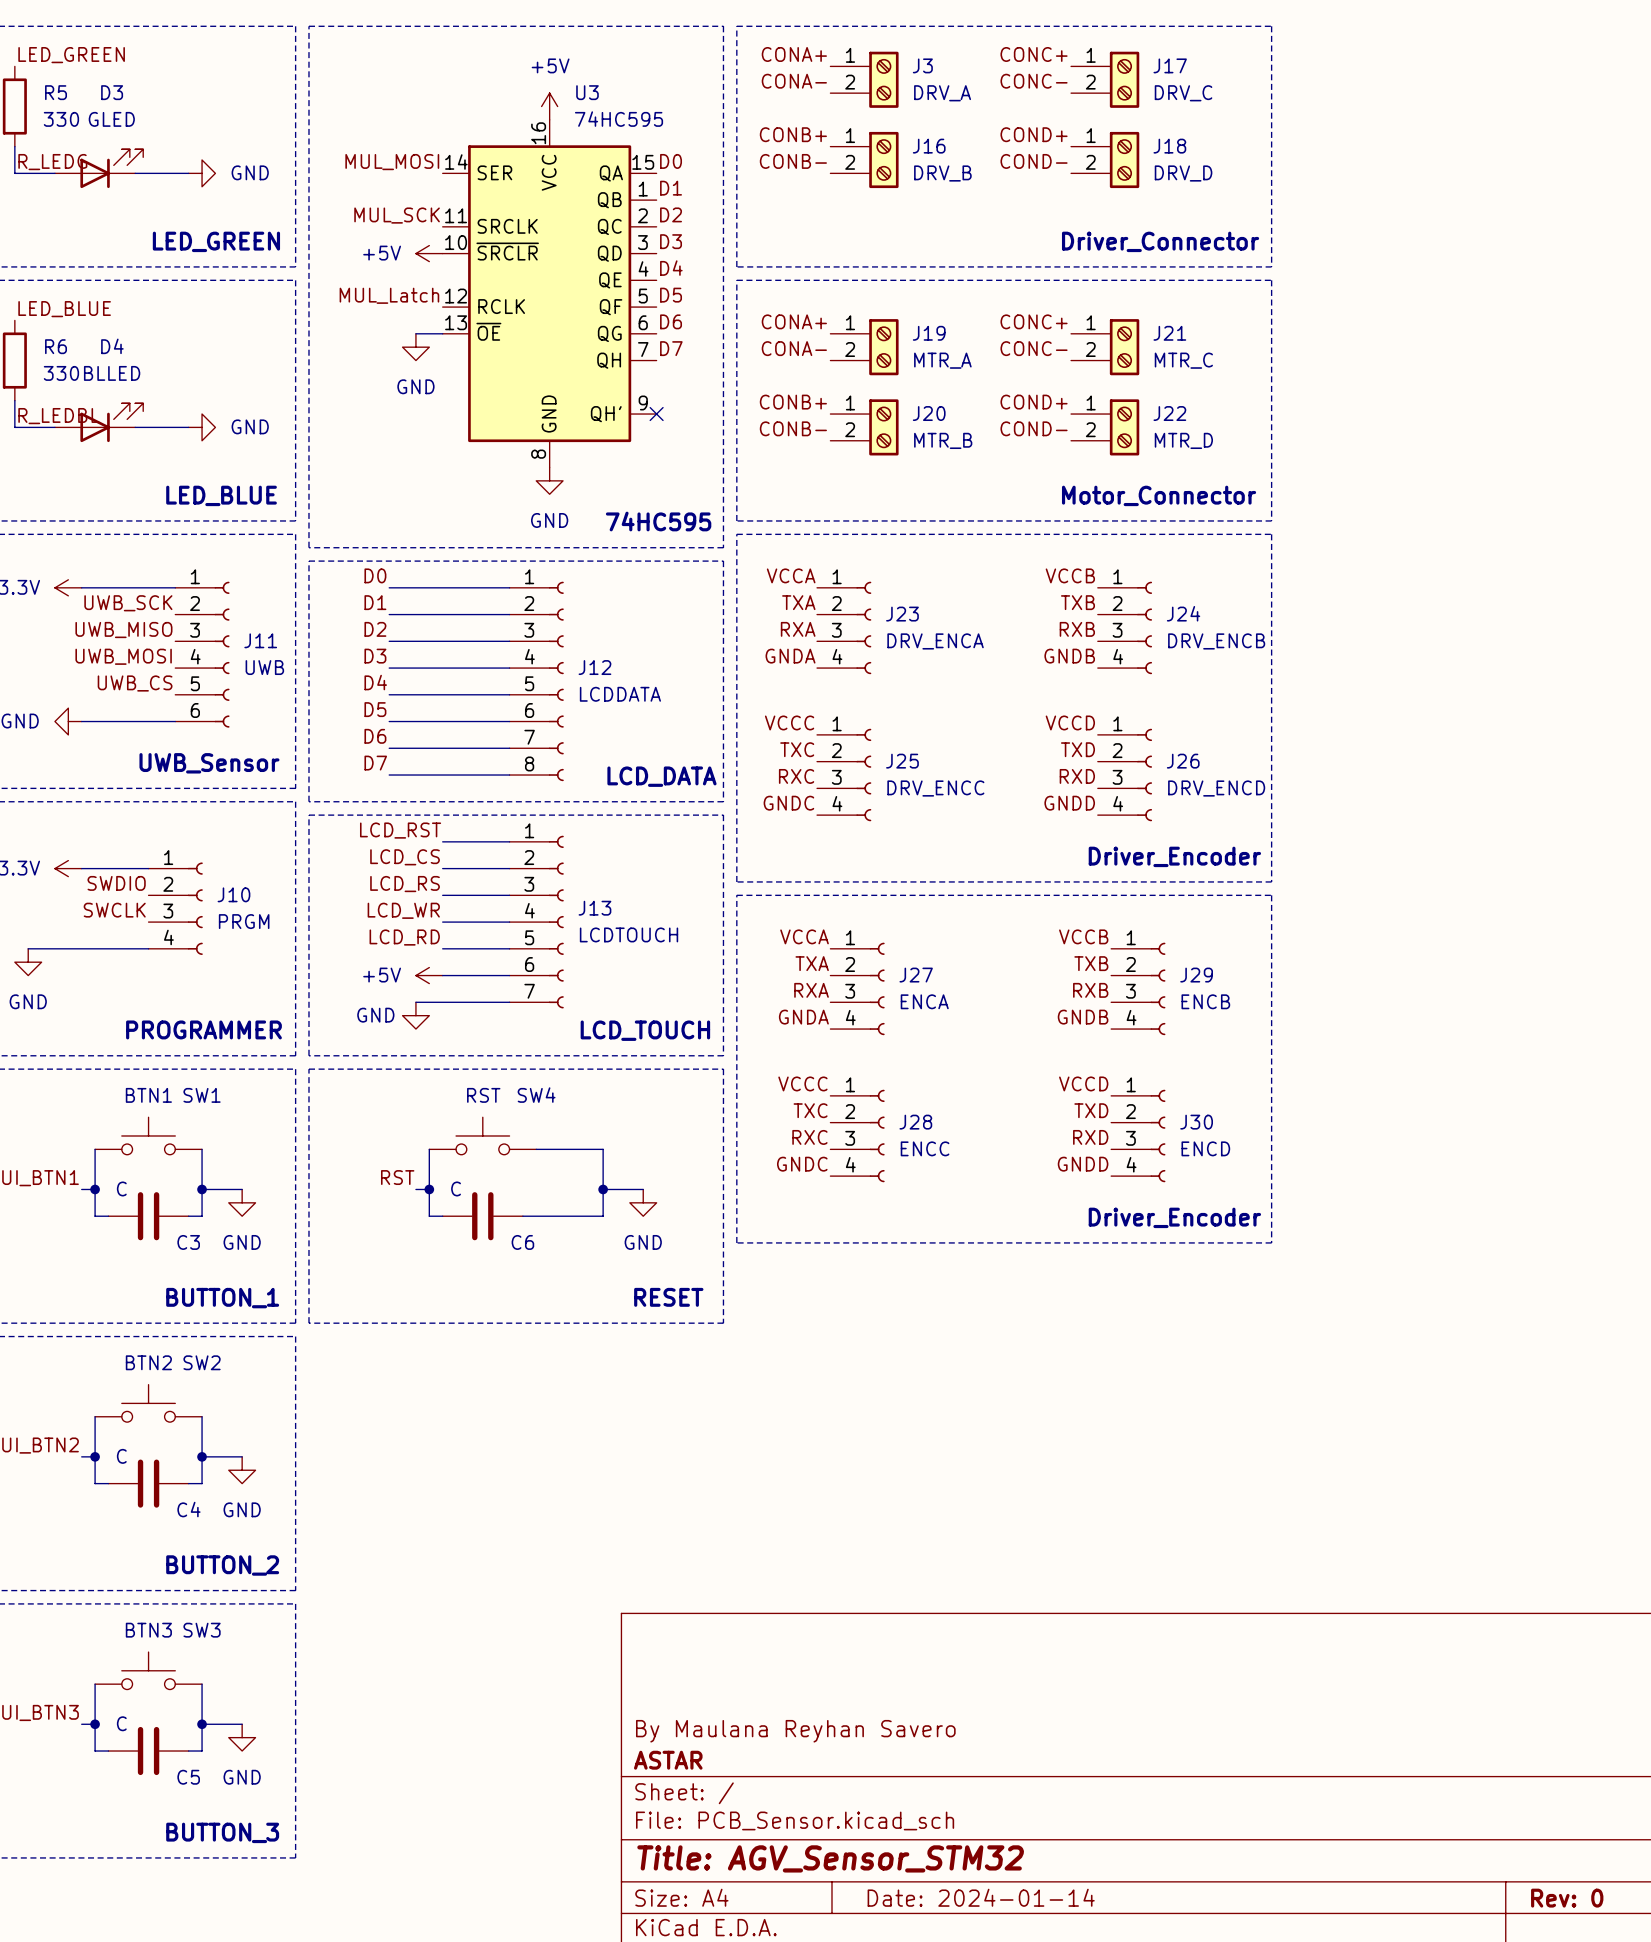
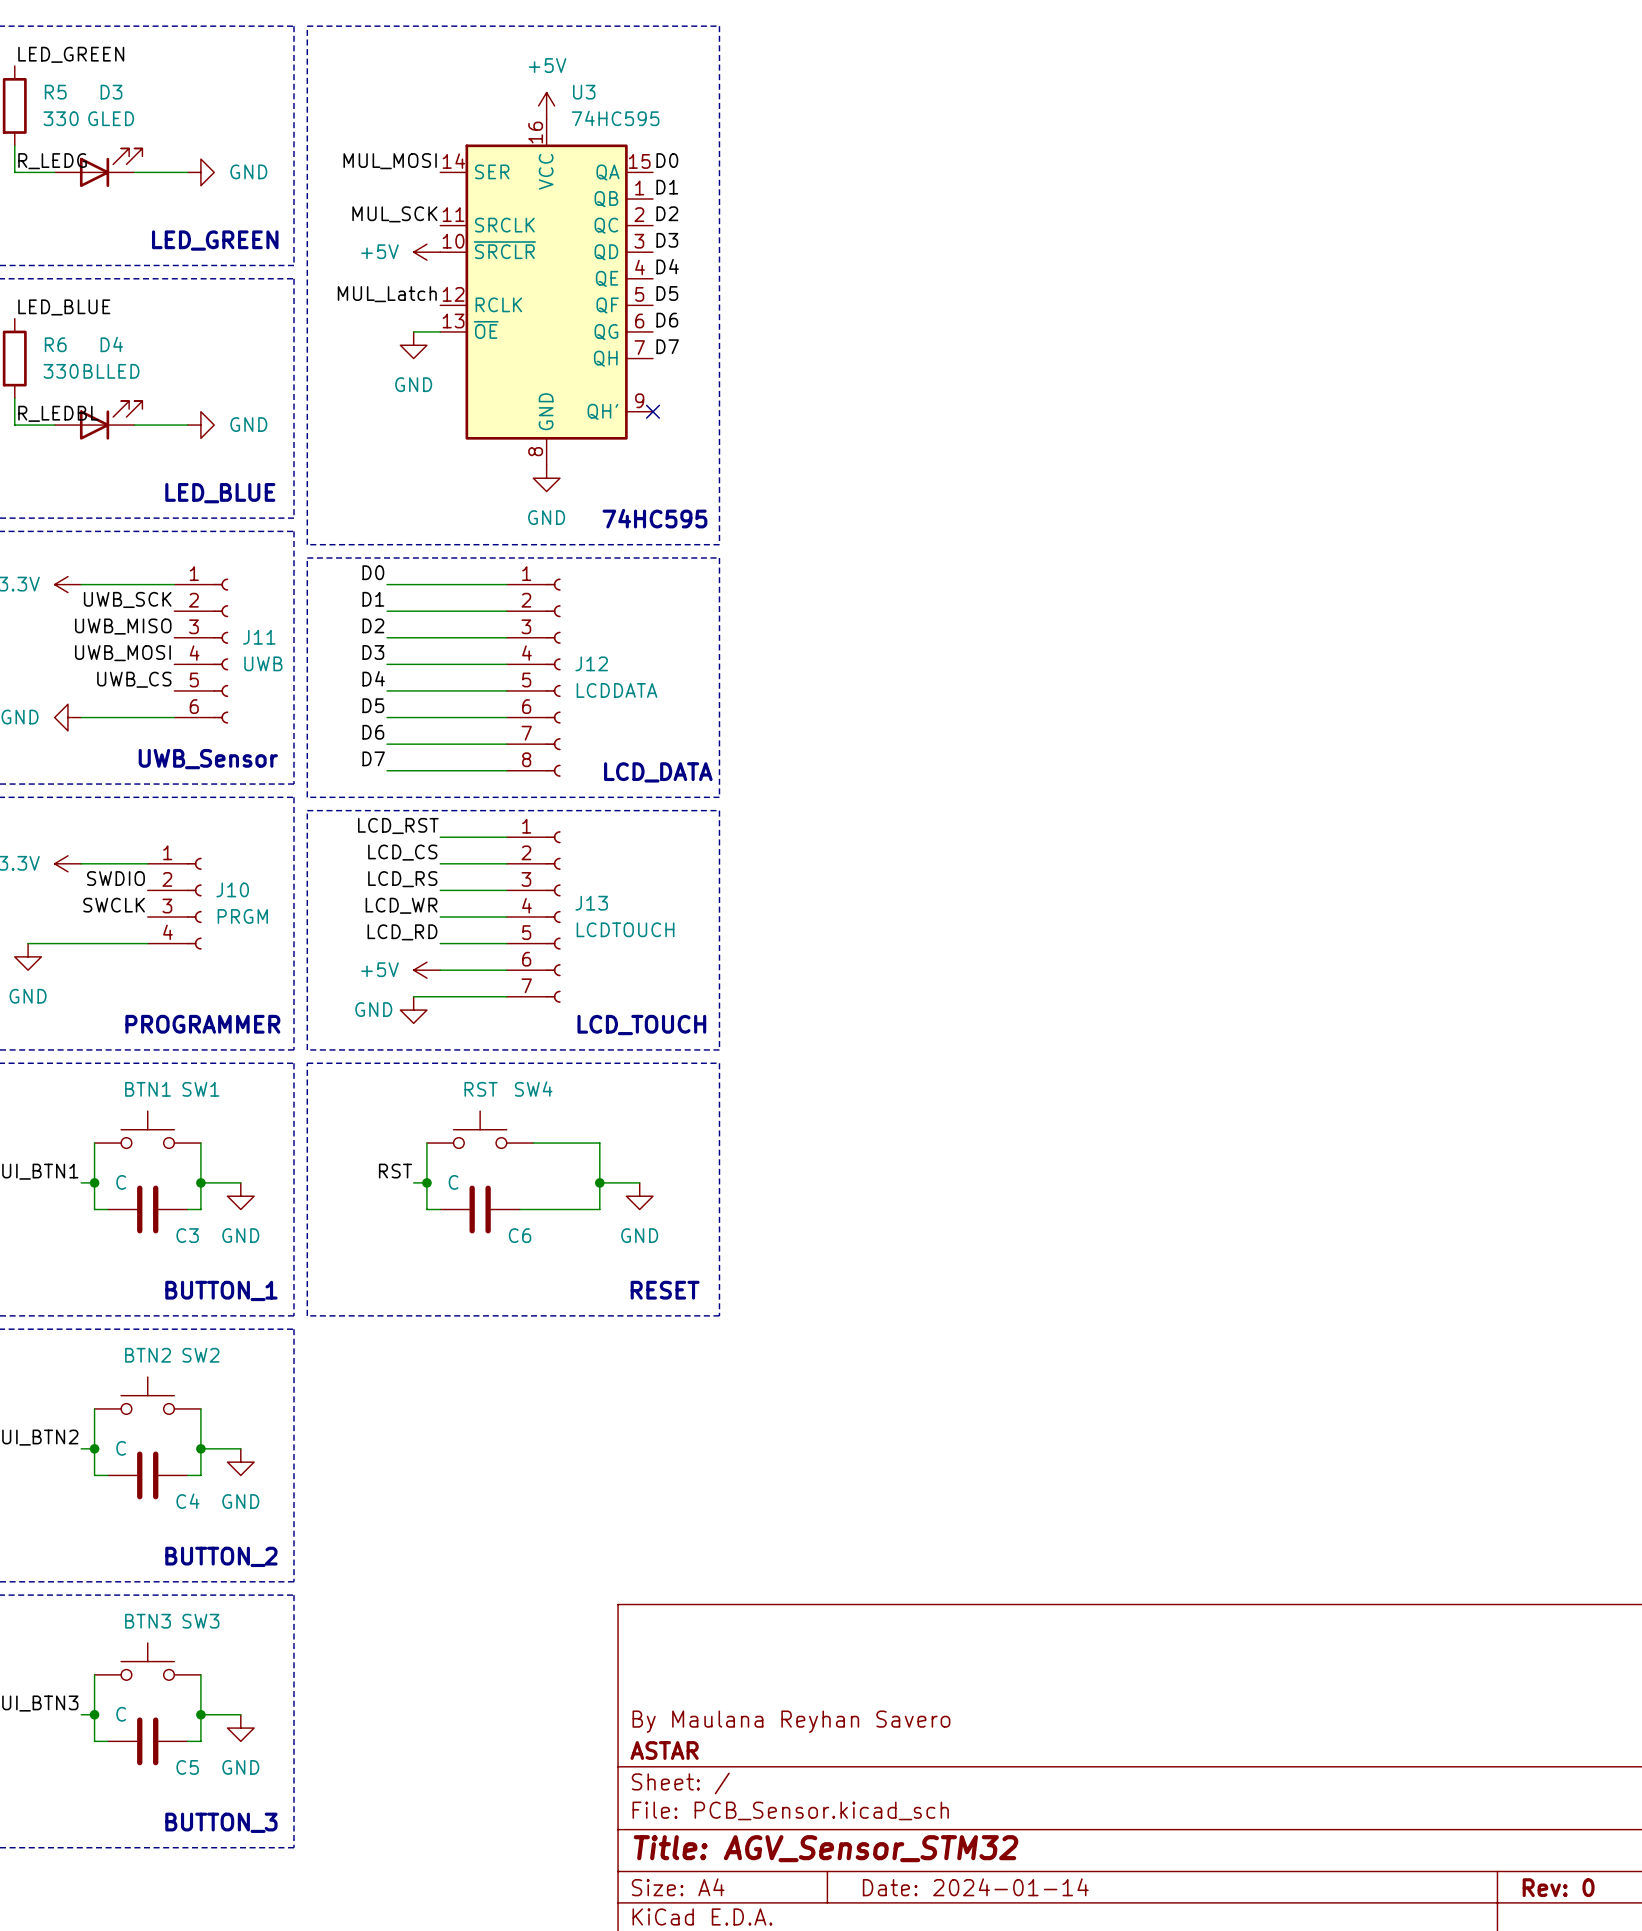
line: (736, 26) (1271, 26) (1271, 266) (736, 266) (736, 26) -> none
label: CONA+ (794, 54) -> none
label: CONC+ (1034, 54) -> none
J3: DRV_A (864, 79) -> none
J17: DRV_C (1105, 79) -> none
label: CONA- (794, 81) -> none
label: CONC- (1034, 81) -> none
label: CONB+ (793, 134) -> none
label: COND+ (1034, 134) -> none
J16: DRV_B (864, 159) -> none
J18: DRV_D (1105, 159) -> none
label: CONB- (793, 161) -> none
label: COND- (1034, 161) -> none
text: Driver_Connector (1160, 241) -> none
line: (736, 280) (736, 520) (1271, 520) (1271, 280) (736, 280) -> none
label: CONA+ (794, 321) -> none
label: CONC+ (1034, 321) -> none
J19: MTR_A (864, 347) -> none
J21: MTR_C (1105, 347) -> none
label: CONA- (794, 348) -> none
label: CONC- (1034, 348) -> none
label: CONB+ (793, 402) -> none
label: COND+ (1034, 402) -> none
J20: MTR_B (864, 427) -> none
J22: MTR_D (1105, 427) -> none
label: CONB- (793, 428) -> none
label: COND- (1034, 428) -> none
text: Motor_Connector (1159, 495) -> none
line: (736, 534) (736, 881) (1271, 881) (1271, 534) (736, 534) -> none
label: VCCA (791, 575) -> none
label: VCCB (1070, 575) -> none
label: TXA (798, 602) -> none
label: TXB (1077, 602) -> none
J23: DRV_ENCA (844, 627) -> none
J24: DRV_ENCB (1124, 627) -> none
label: RXA (798, 629) -> none
label: RXB (1077, 629) -> none
label: GNDA (790, 656) -> none
label: GNDB (1069, 656) -> none
label: VCCC (789, 722) -> none
label: VCCD (1070, 722) -> none
label: TXC (797, 749) -> none
label: TXD (1077, 749) -> none
J25: DRV_ENCC (844, 775) -> none
J26: DRV_ENCD (1124, 775) -> none
label: RXC (796, 776) -> none
label: RXD (1077, 776) -> none
label: GNDC (788, 803) -> none
label: GNDD (1069, 803) -> none
text: Driver_Encoder (1174, 856) -> none
line: (736, 895) (736, 1242) (1271, 1242) (1271, 895) (736, 895) -> none
label: VCCA (804, 936) -> none
label: VCCB (1083, 936) -> none
label: TXA (812, 963) -> none
label: TXB (1091, 963) -> none
J27: ENCA (857, 988) -> none
J29: ENCB (1138, 988) -> none
label: RXA (811, 990) -> none
label: RXB (1090, 990) -> none
label: GNDA (803, 1017) -> none
label: GNDB (1083, 1017) -> none
label: VCCC (802, 1083) -> none
label: VCCD (1083, 1083) -> none
label: TXC (810, 1110) -> none
label: TXD (1091, 1110) -> none
J28: ENCC (857, 1135) -> none
J30: ENCD (1138, 1135) -> none
label: RXC (809, 1137) -> none
label: RXD (1090, 1137) -> none
label: GNDC (802, 1164) -> none
label: GNDD (1083, 1164) -> none
text: Driver_Encoder (1174, 1217) -> none

